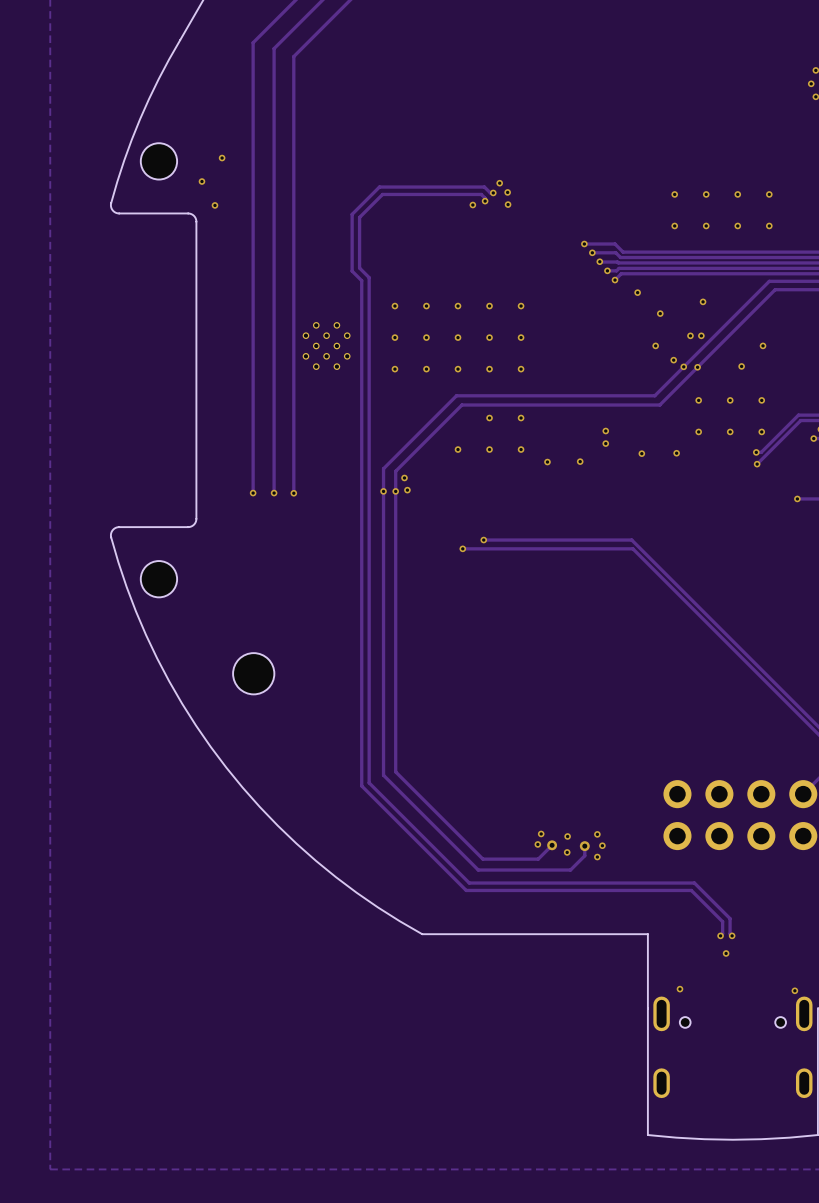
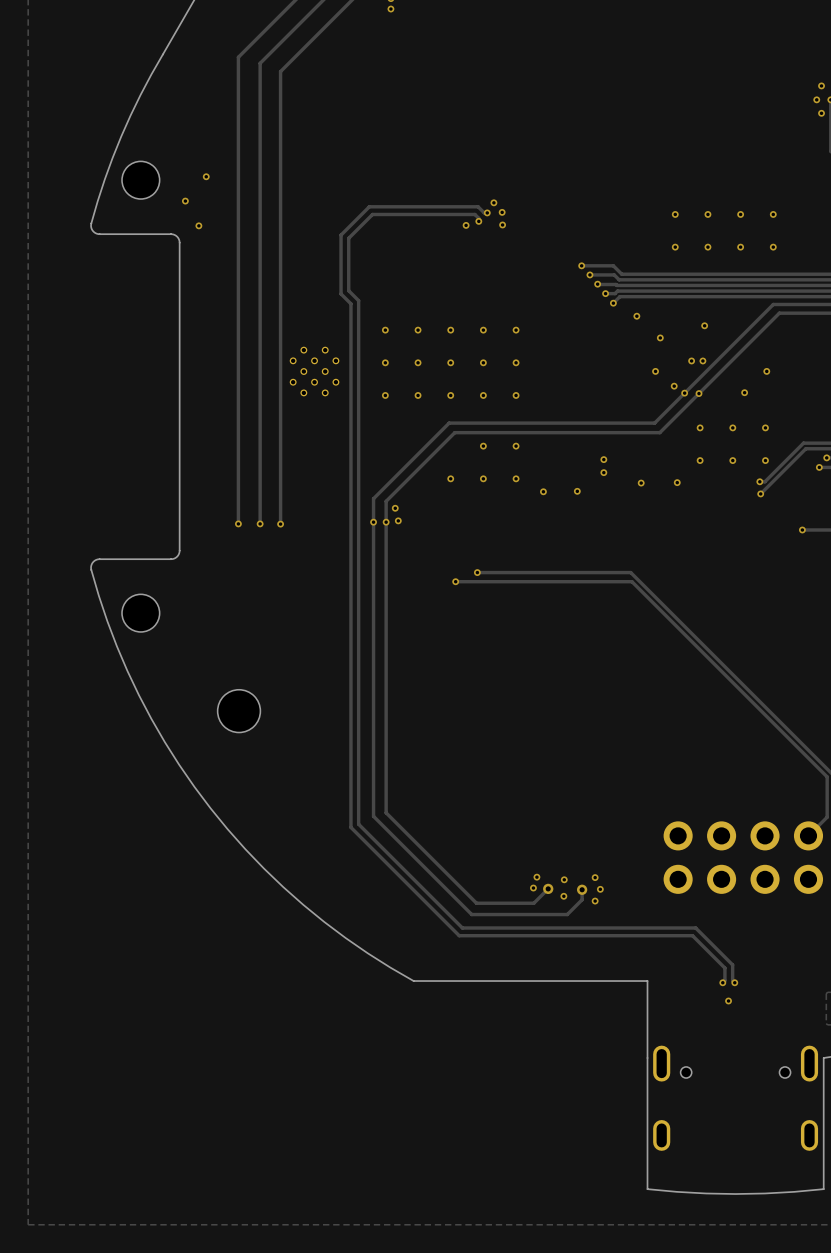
via: (679, 989) -> none
via: (794, 990) -> none

